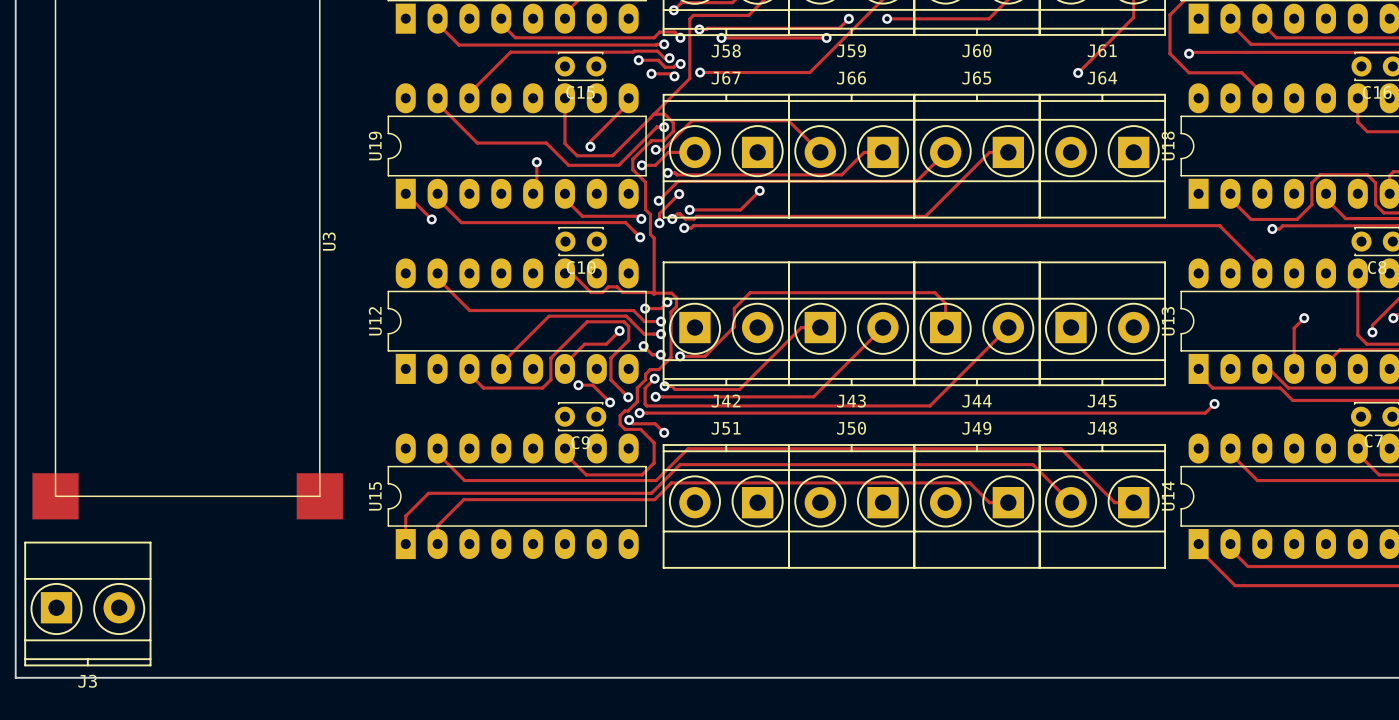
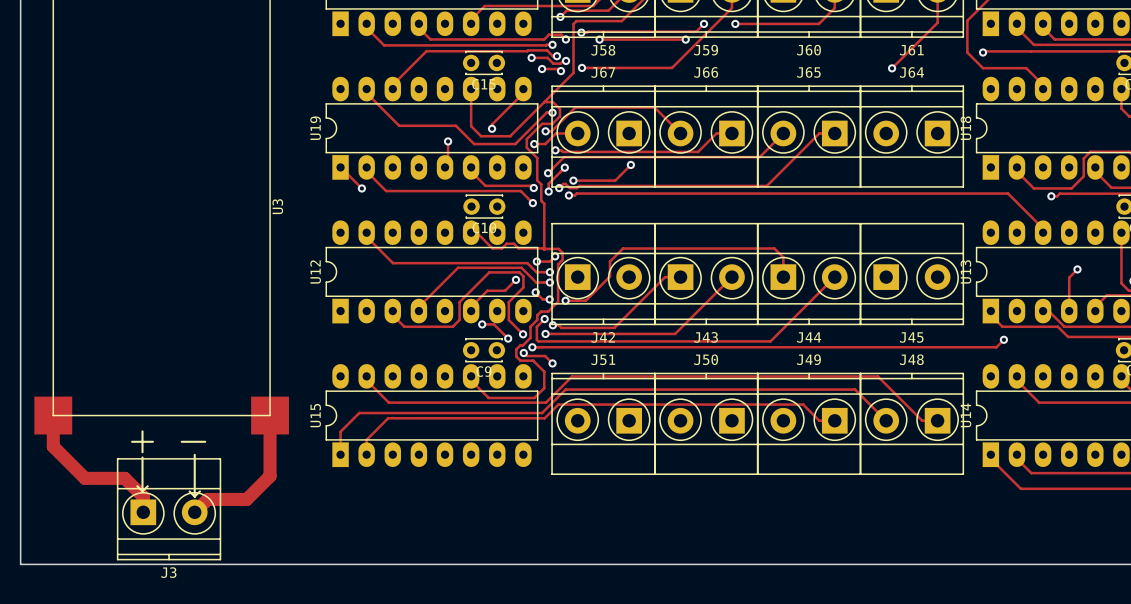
track: none -> (53, 415) (53, 446) (85, 478) (124, 478) (143, 496) (143, 512)
track: none -> (270, 415) (270, 476) (246, 499) (207, 499) (194, 512)
line: none -> (142, 431) (142, 452)
line: none -> (132, 441) (152, 441)
line: none -> (181, 441) (205, 441)
line: none -> (194, 454) (194, 496)
line: none -> (142, 457) (142, 491)
line: none -> (137, 486) (142, 491)
line: none -> (147, 486) (142, 491)
line: none -> (189, 491) (194, 496)
line: none -> (199, 491) (194, 496)
J3 position: (87, 603) -> (169, 509)

